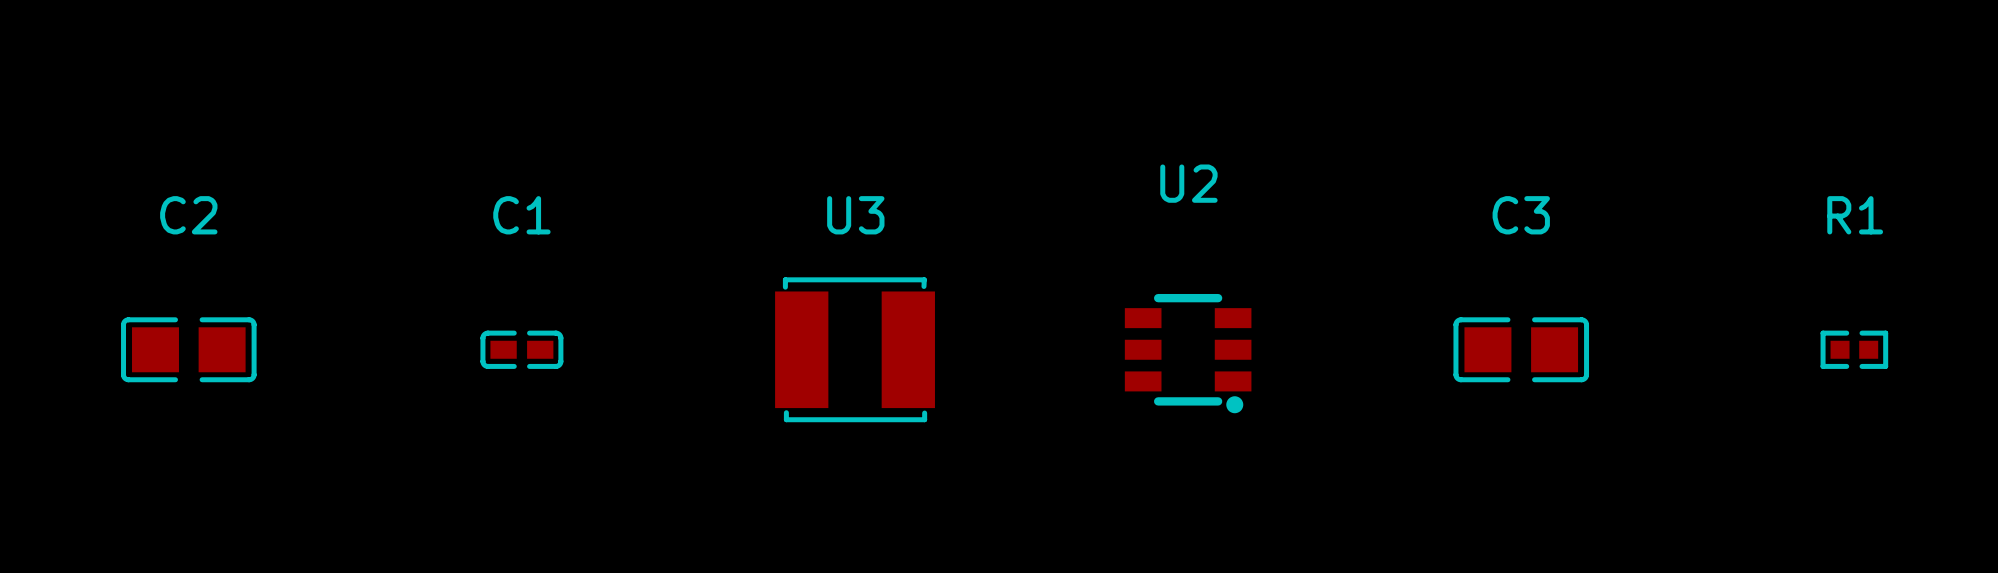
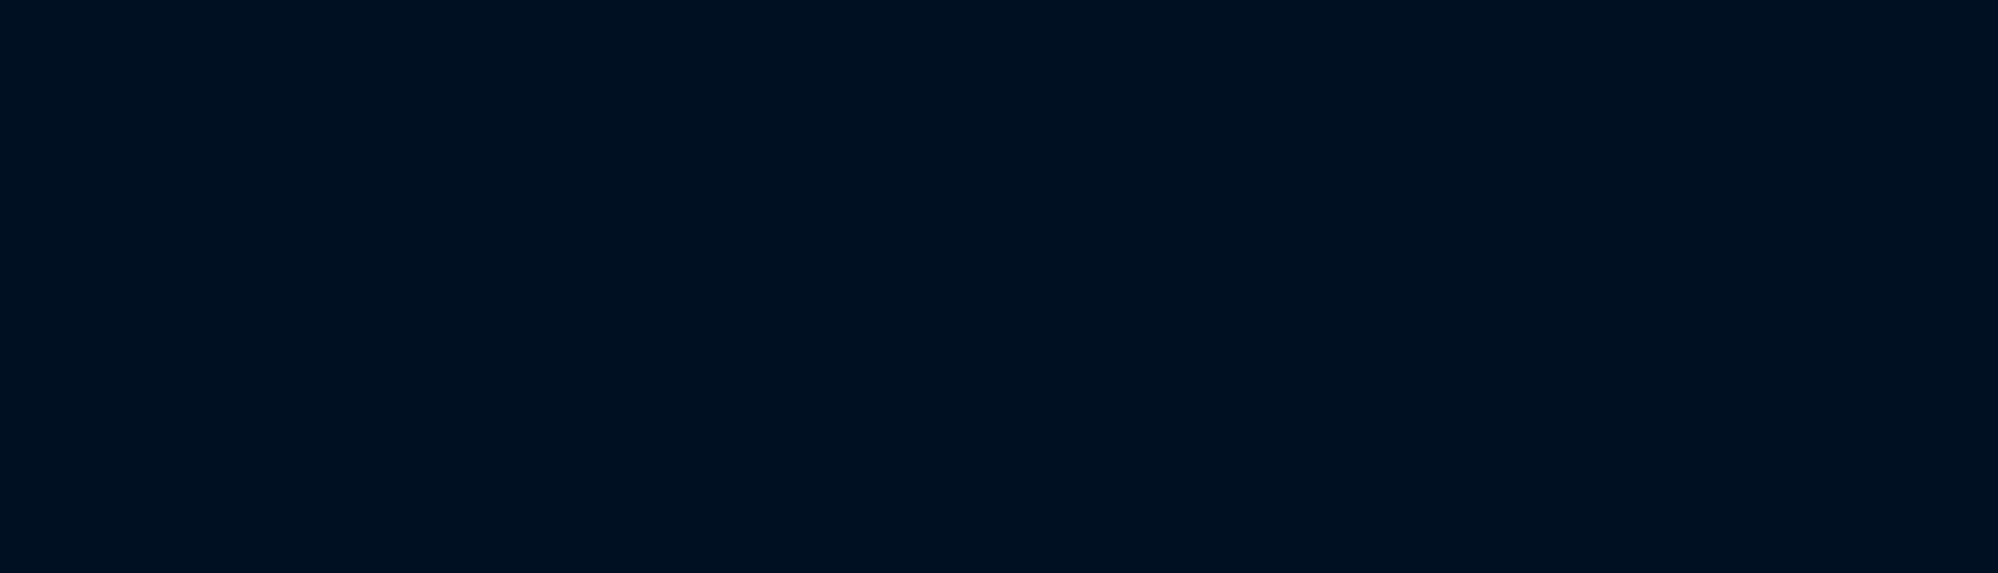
C2: (188, 349) -> none
C1: (521, 349) -> none
U3: (855, 349) -> none
C3: (1521, 349) -> none
R1: (1854, 349) -> none
U2: (1188, 353) -> none

